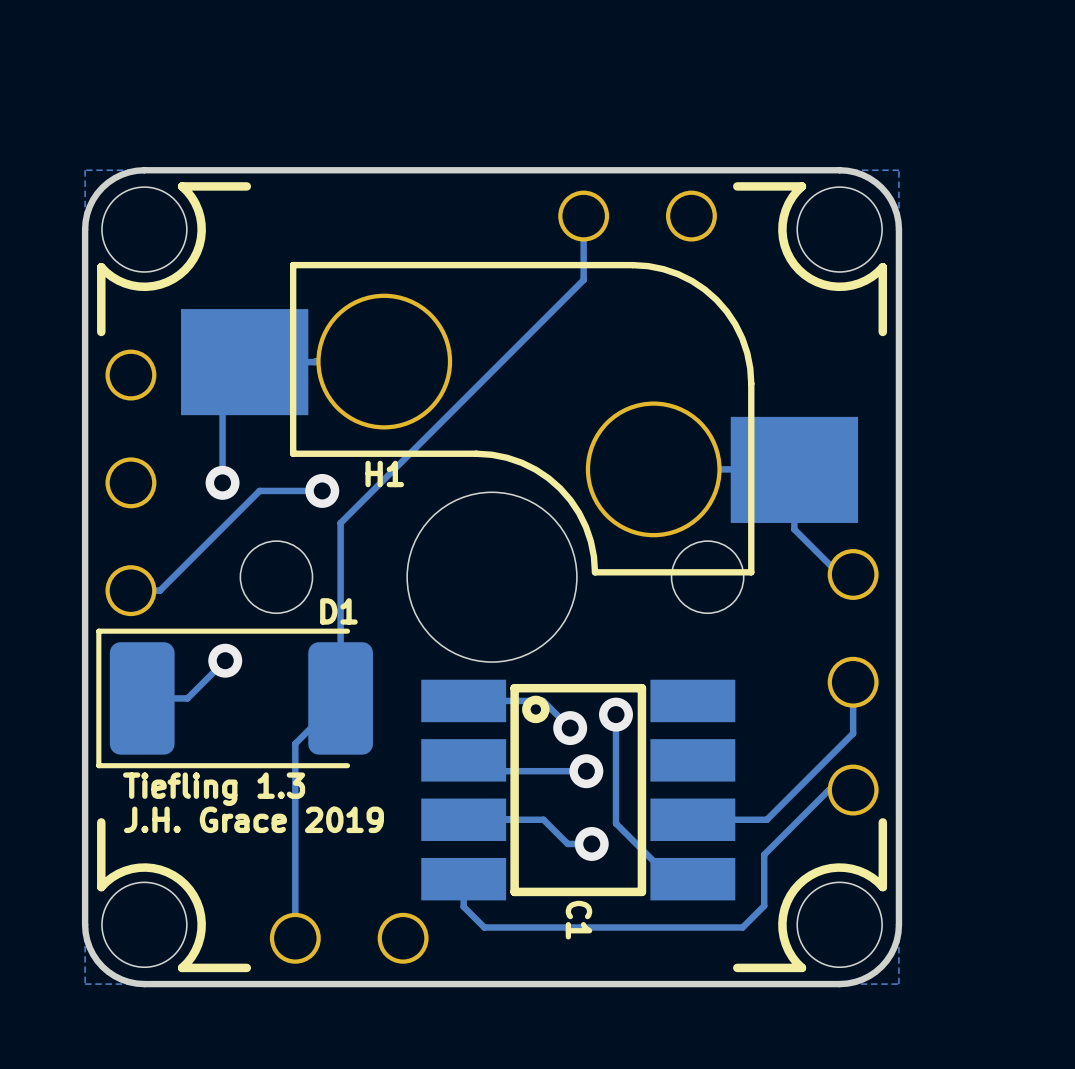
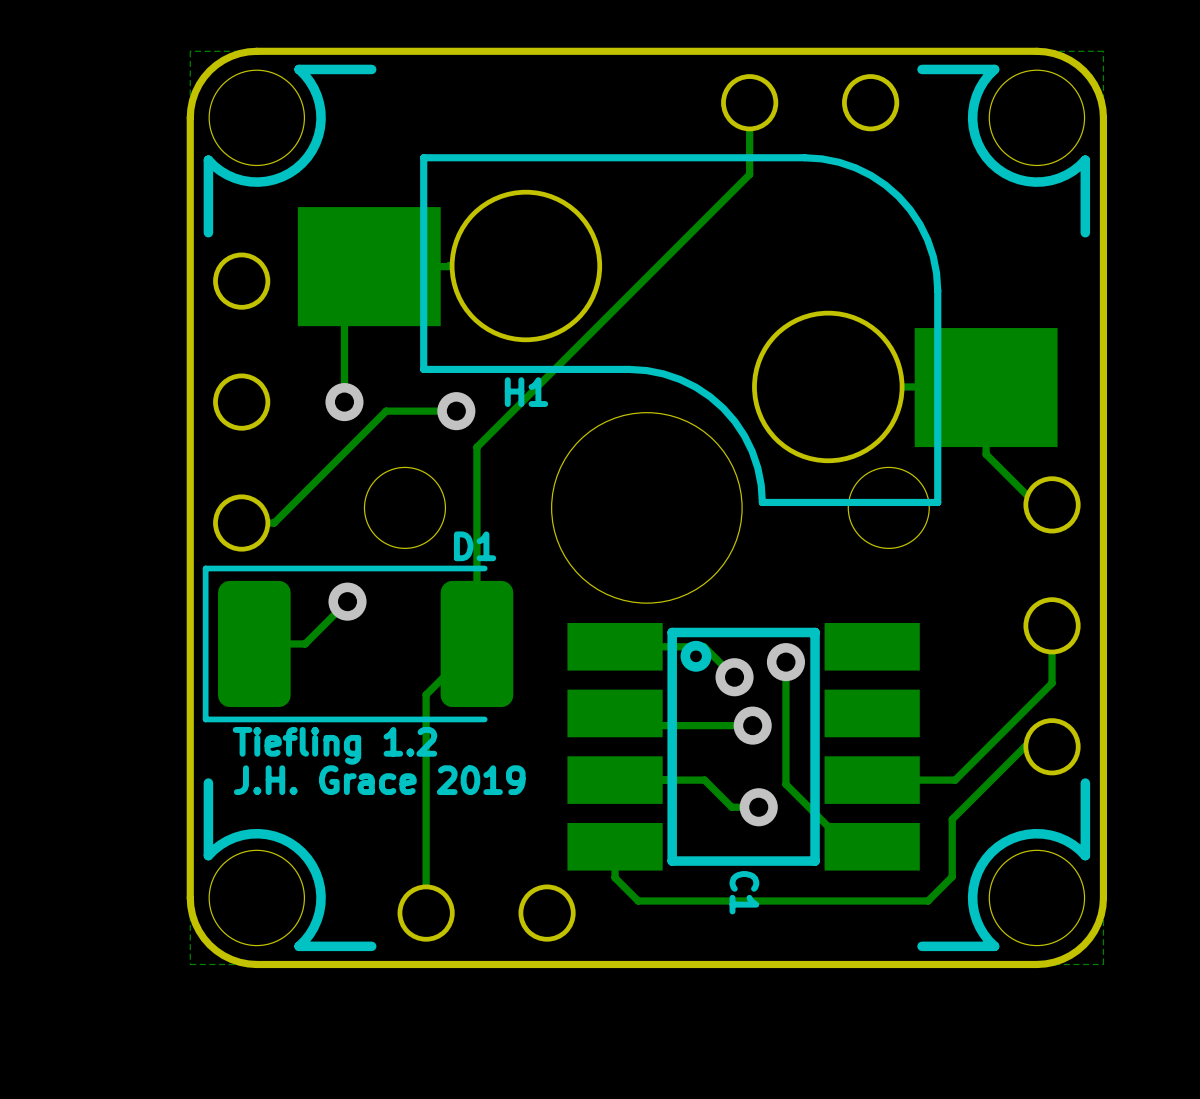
text: Tiefling 1.3 (214, 789) -> Tiefling 1.2 (334, 745)

